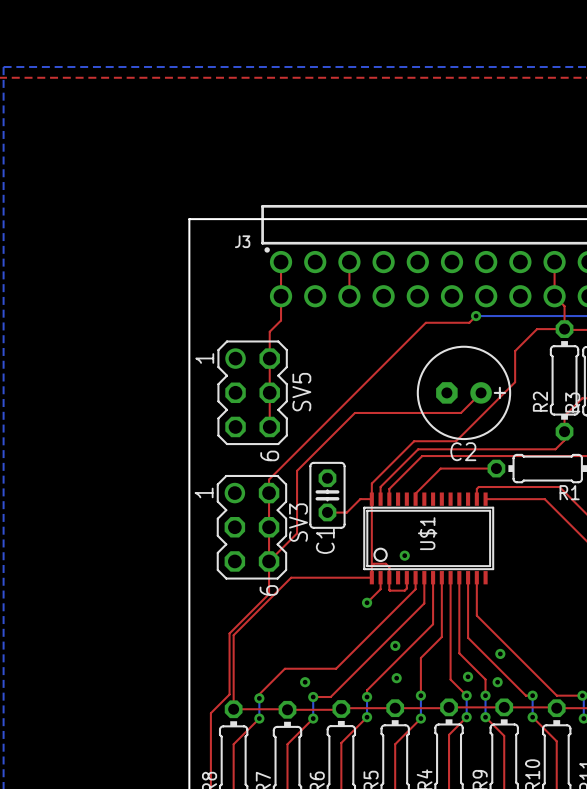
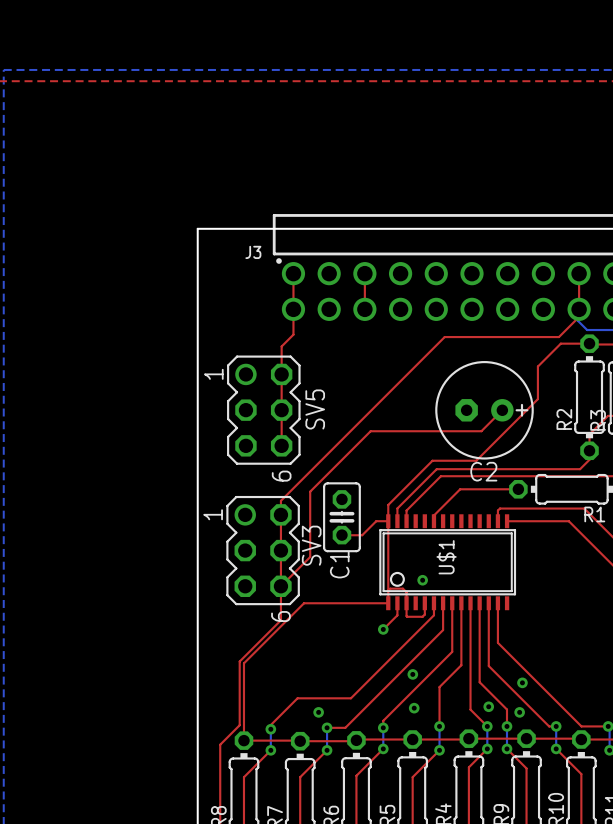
top track: (554, 296) (564, 306) (564, 329) -> none
top track: (476, 316) (469, 322) -> (579, 309) (579, 316) (559, 337) (490, 337)
bottom track: (476, 316) (562, 316) -> (579, 309) (577, 320) (587, 330)
via: (476, 316) -> none

